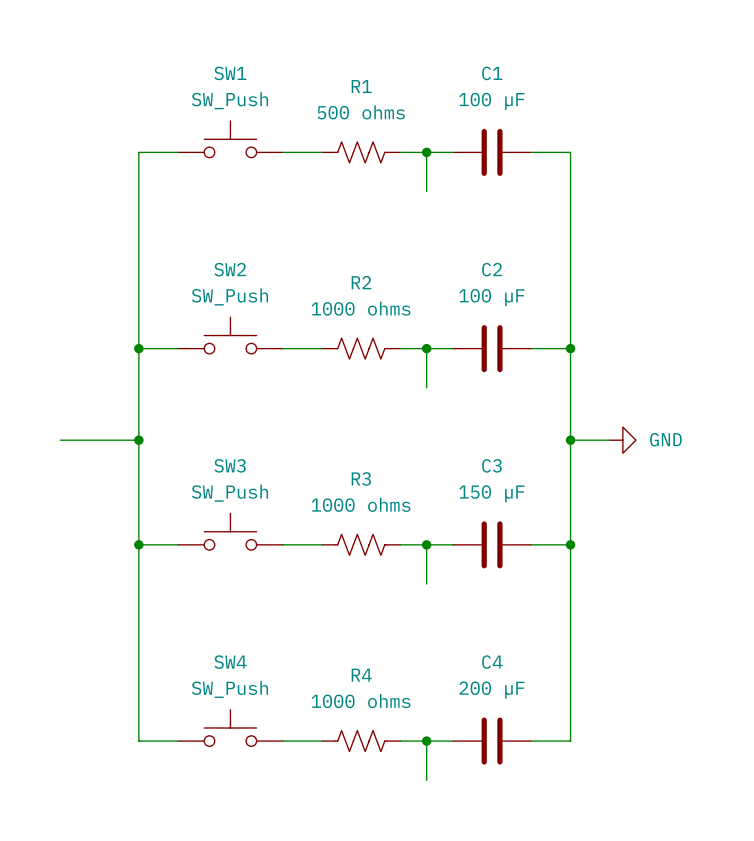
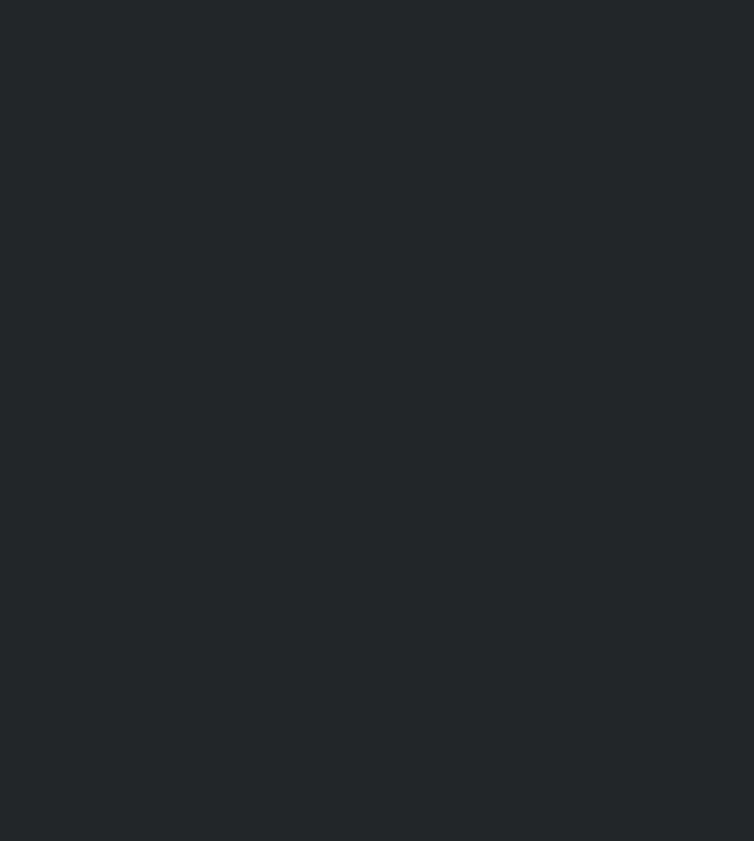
SW1: SW_Push (230, 139) -> none
wire: (178, 152) (138, 152) (138, 741) (178, 741) -> none
wire: (282, 152) (322, 152) -> none
R1: 500 ohms (361, 152) -> none
wire: (400, 152) (452, 152) -> none
wire: (426, 152) (426, 191) -> none
junction: (426, 152) -> none
C1: 100 µF (492, 152) -> none
wire: (531, 152) (570, 152) (570, 741) (531, 741) -> none
SW2: SW_Push (230, 335) -> none
wire: (138, 348) (178, 348) -> none
junction: (138, 348) -> none
wire: (282, 348) (322, 348) -> none
R2: 1000 ohms (361, 348) -> none
wire: (400, 348) (452, 348) -> none
wire: (426, 348) (426, 387) -> none
junction: (426, 348) -> none
C2: 100 µF (492, 348) -> none
wire: (531, 348) (570, 348) -> none
junction: (570, 348) -> none
wire: (60, 440) (138, 440) -> none
junction: (138, 440) -> none
wire: (570, 440) (609, 440) -> none
junction: (570, 440) -> none
power symbol: GND (622, 440) -> none
SW3: SW_Push (230, 531) -> none
wire: (138, 544) (178, 544) -> none
junction: (138, 544) -> none
wire: (282, 544) (322, 544) -> none
R3: 1000 ohms (361, 544) -> none
wire: (400, 544) (452, 544) -> none
wire: (426, 544) (426, 584) -> none
junction: (426, 544) -> none
C3: 150 µF (492, 544) -> none
wire: (531, 544) (570, 544) -> none
junction: (570, 544) -> none
SW4: SW_Push (230, 727) -> none
wire: (282, 741) (322, 741) -> none
R4: 1000 ohms (361, 741) -> none
wire: (400, 741) (452, 741) -> none
wire: (426, 741) (426, 780) -> none
junction: (426, 741) -> none
C4: 200 µF (492, 741) -> none

